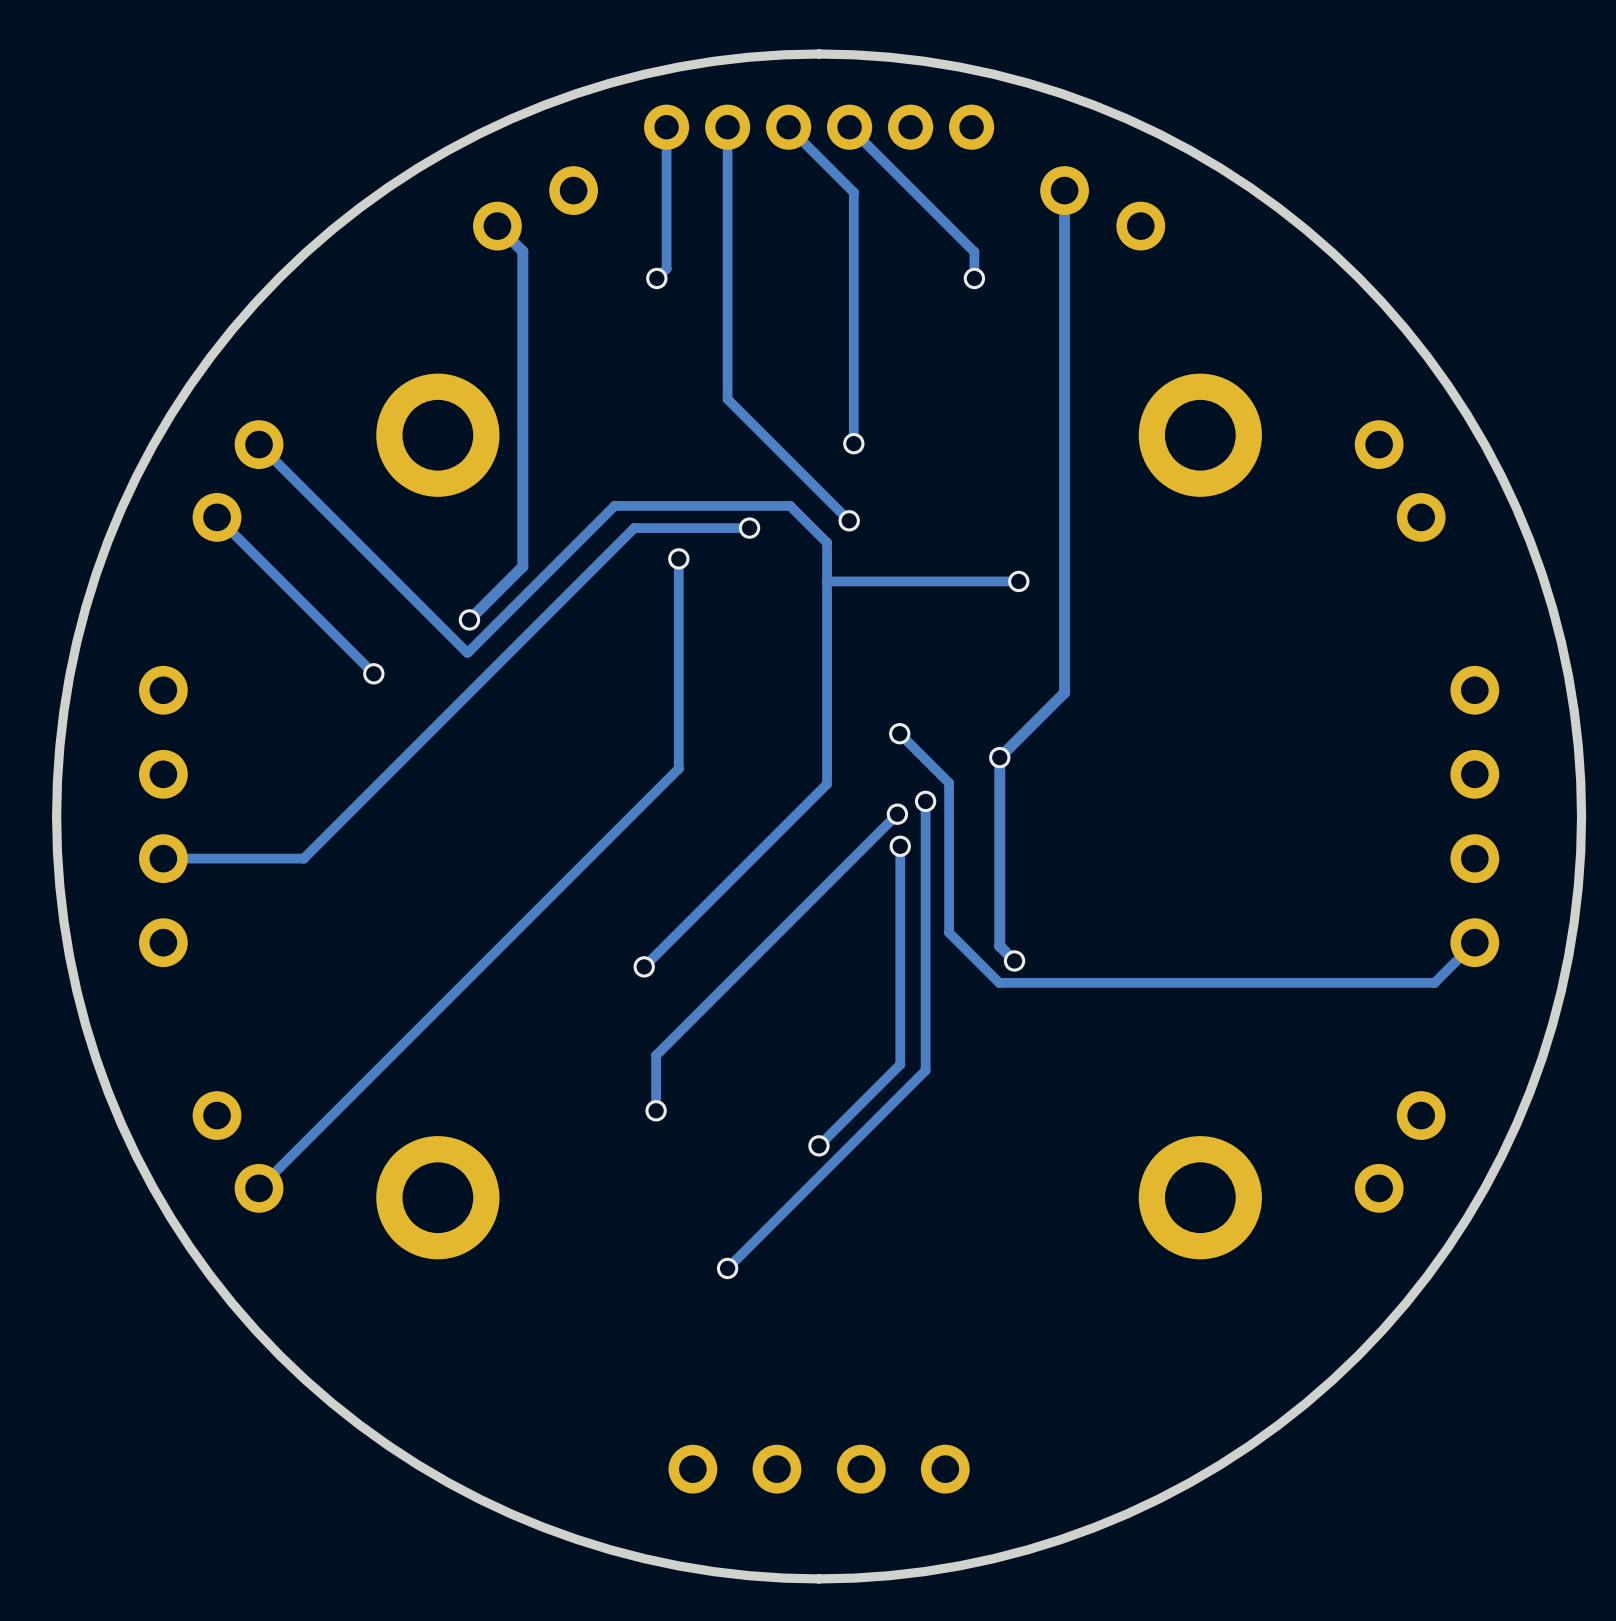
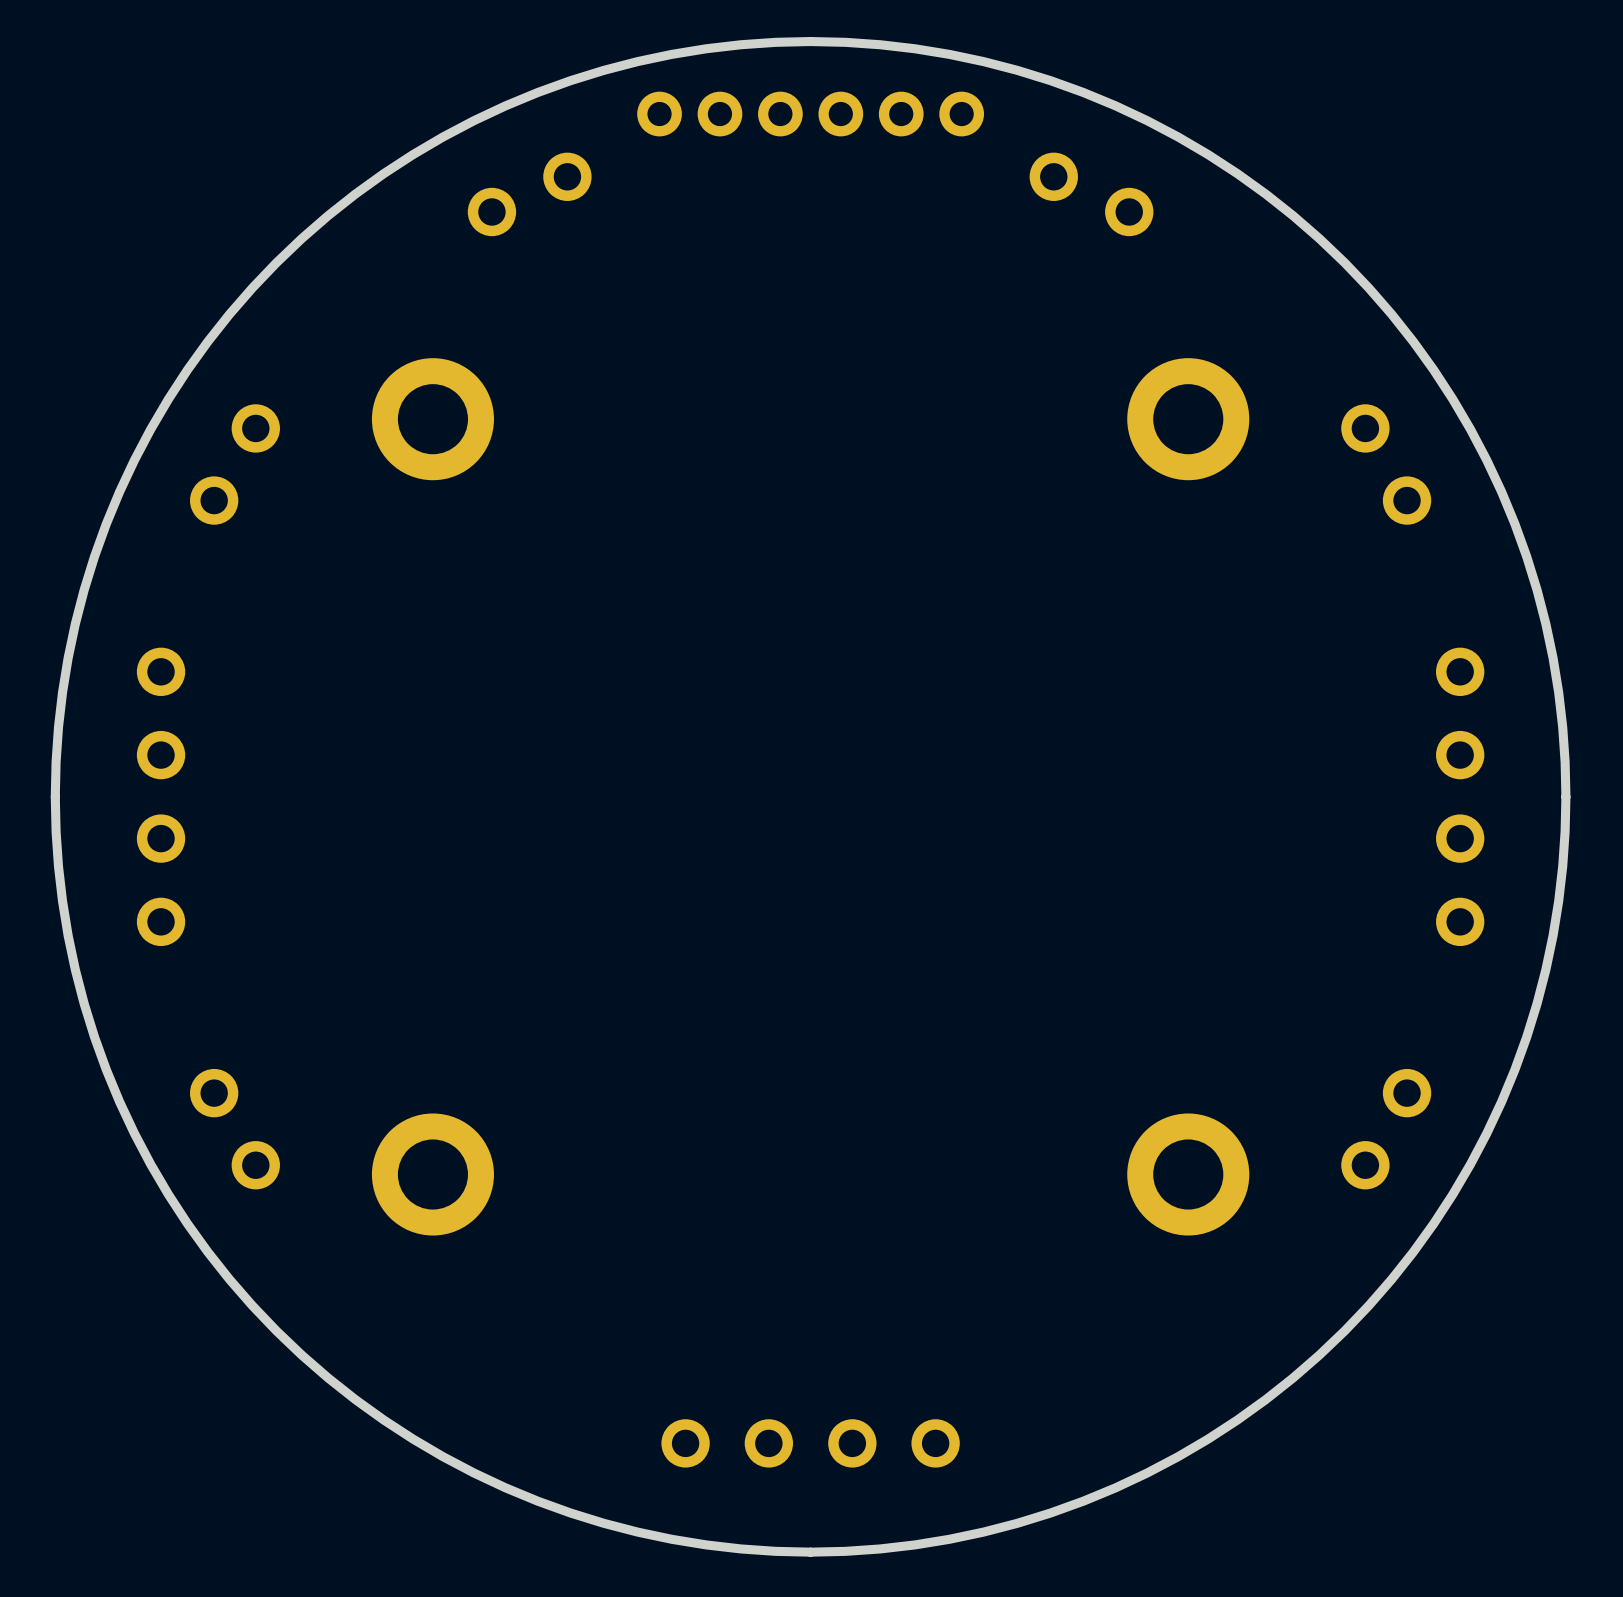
track: (666, 127) (666, 268) (656, 278) -> none
track: (727, 127) (727, 399) (849, 520) -> none
track: (788, 127) (853, 192) (853, 443) -> none
track: (849, 127) (974, 251) (974, 278) -> none
track: (1064, 190) (1064, 692) (999, 757) (999, 946) (1014, 960) -> none
track: (497, 226) (522, 251) (522, 566) (469, 619) -> none
via: (656, 278) -> none
via: (974, 278) -> none
via: (853, 443) -> none
track: (259, 444) (467, 652) (614, 505) (790, 505) (827, 542) (827, 784) (644, 966) -> none
track: (217, 517) (373, 673) -> none
via: (849, 520) -> none
track: (749, 528) (634, 528) (303, 858) (163, 858) -> none
via: (749, 528) -> none
track: (678, 558) (678, 768) (259, 1188) -> none
via: (678, 558) -> none
track: (1018, 581) (827, 581) -> none
via: (1018, 581) -> none
via: (469, 619) -> none
via: (373, 673) -> none
track: (899, 733) (949, 783) (949, 932) (999, 982) (1434, 982) (1474, 942) -> none
via: (899, 733) -> none
via: (999, 757) -> none
track: (925, 801) (925, 1070) (727, 1268) -> none
via: (925, 801) -> none
track: (897, 814) (656, 1055) (656, 1110) -> none
via: (897, 814) -> none
track: (900, 846) (900, 1064) (818, 1145) -> none
via: (900, 846) -> none
via: (1014, 960) -> none
via: (644, 966) -> none
via: (656, 1110) -> none
via: (818, 1145) -> none
via: (727, 1268) -> none

